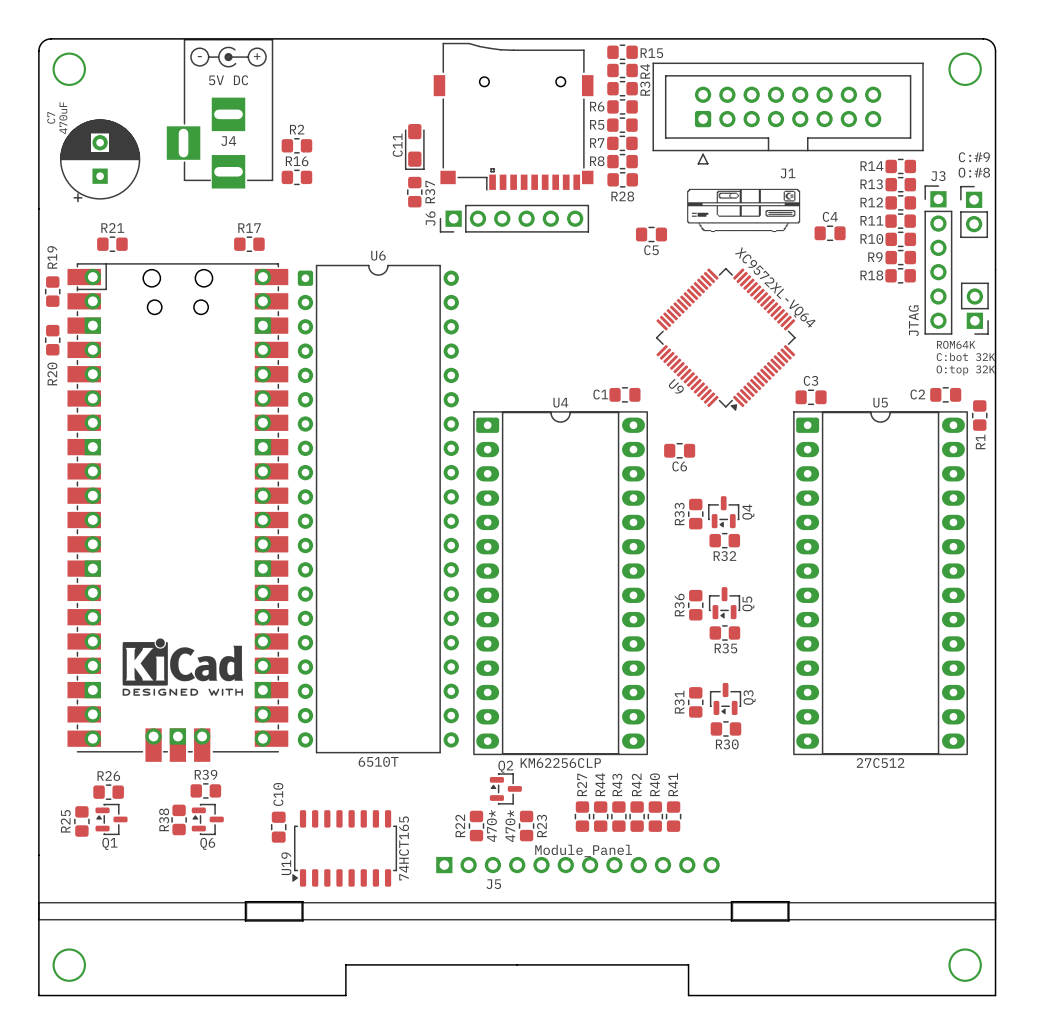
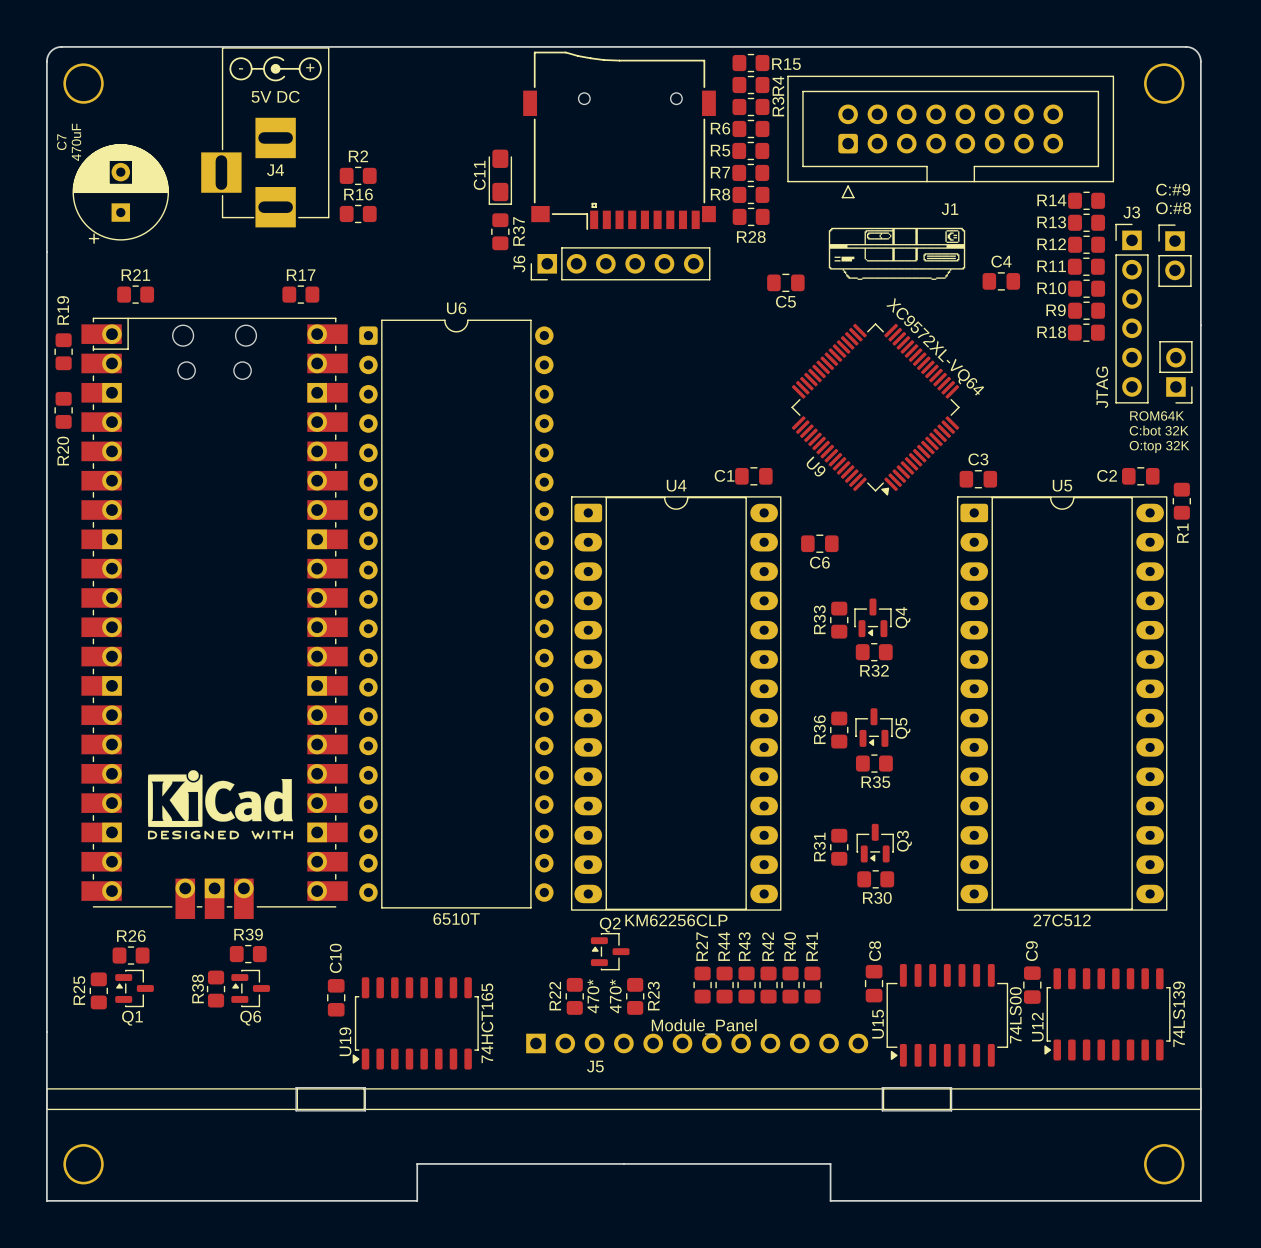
C8: none -> (874, 983)
C9: none -> (1032, 985)
U12: none -> 74LS139 (1107, 1014)
U15: none -> 74LS00 (947, 1015)

